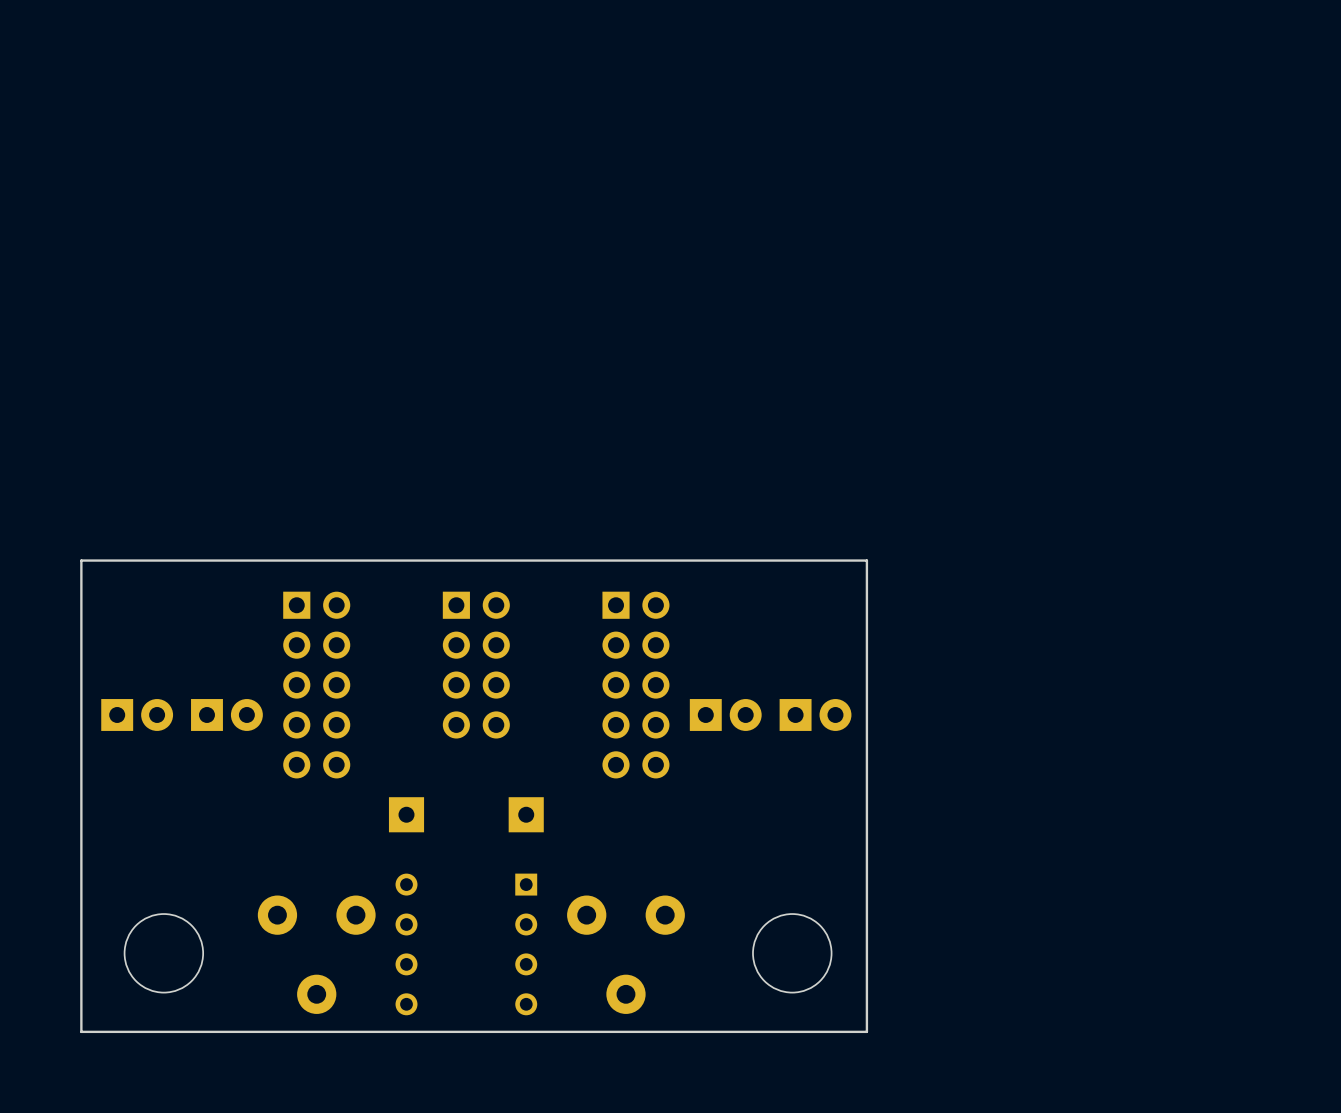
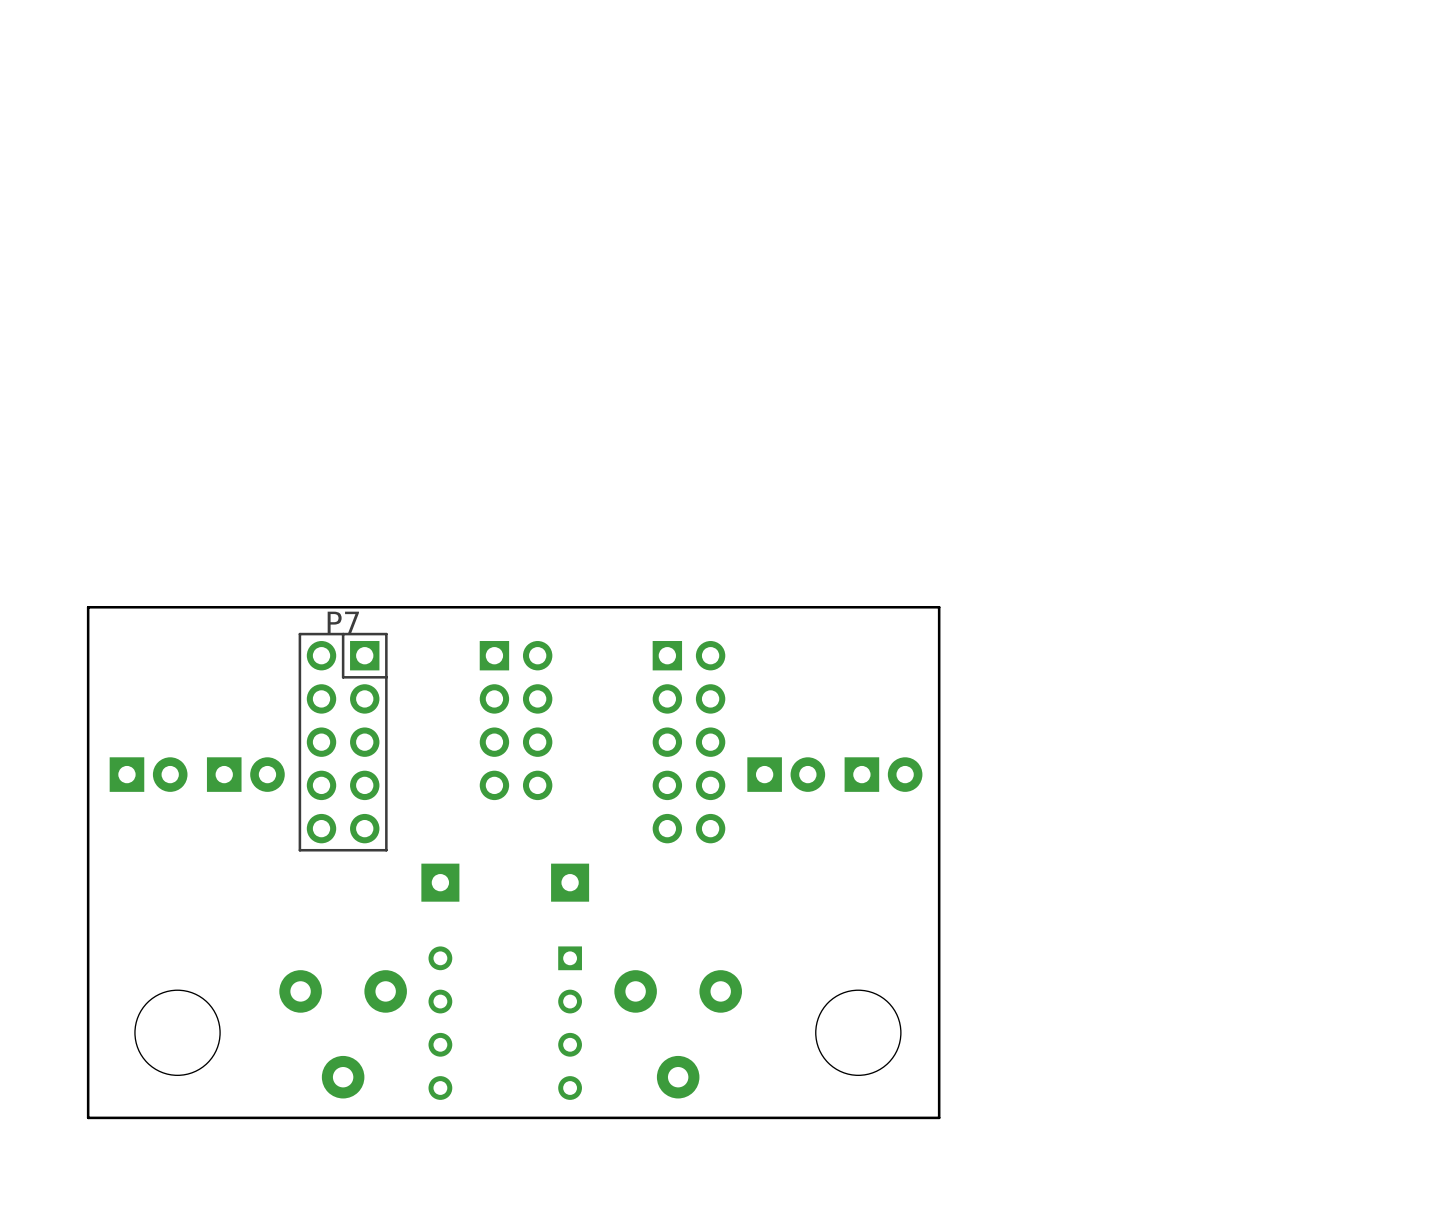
P7 side: top (316, 685) -> bottom (343, 742)

